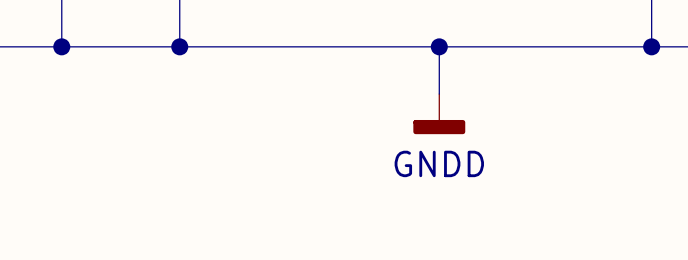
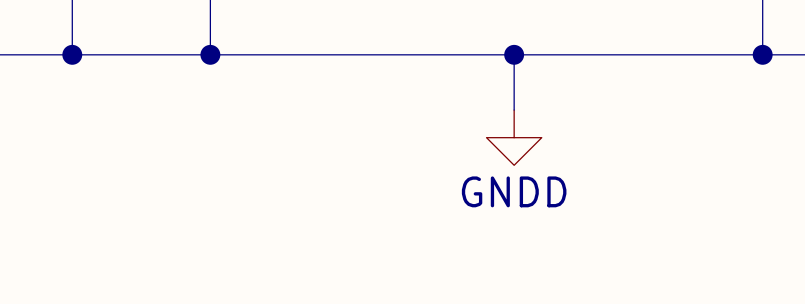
power symbol shape: [413, 94, 466, 135] -> [486, 110, 542, 166]

